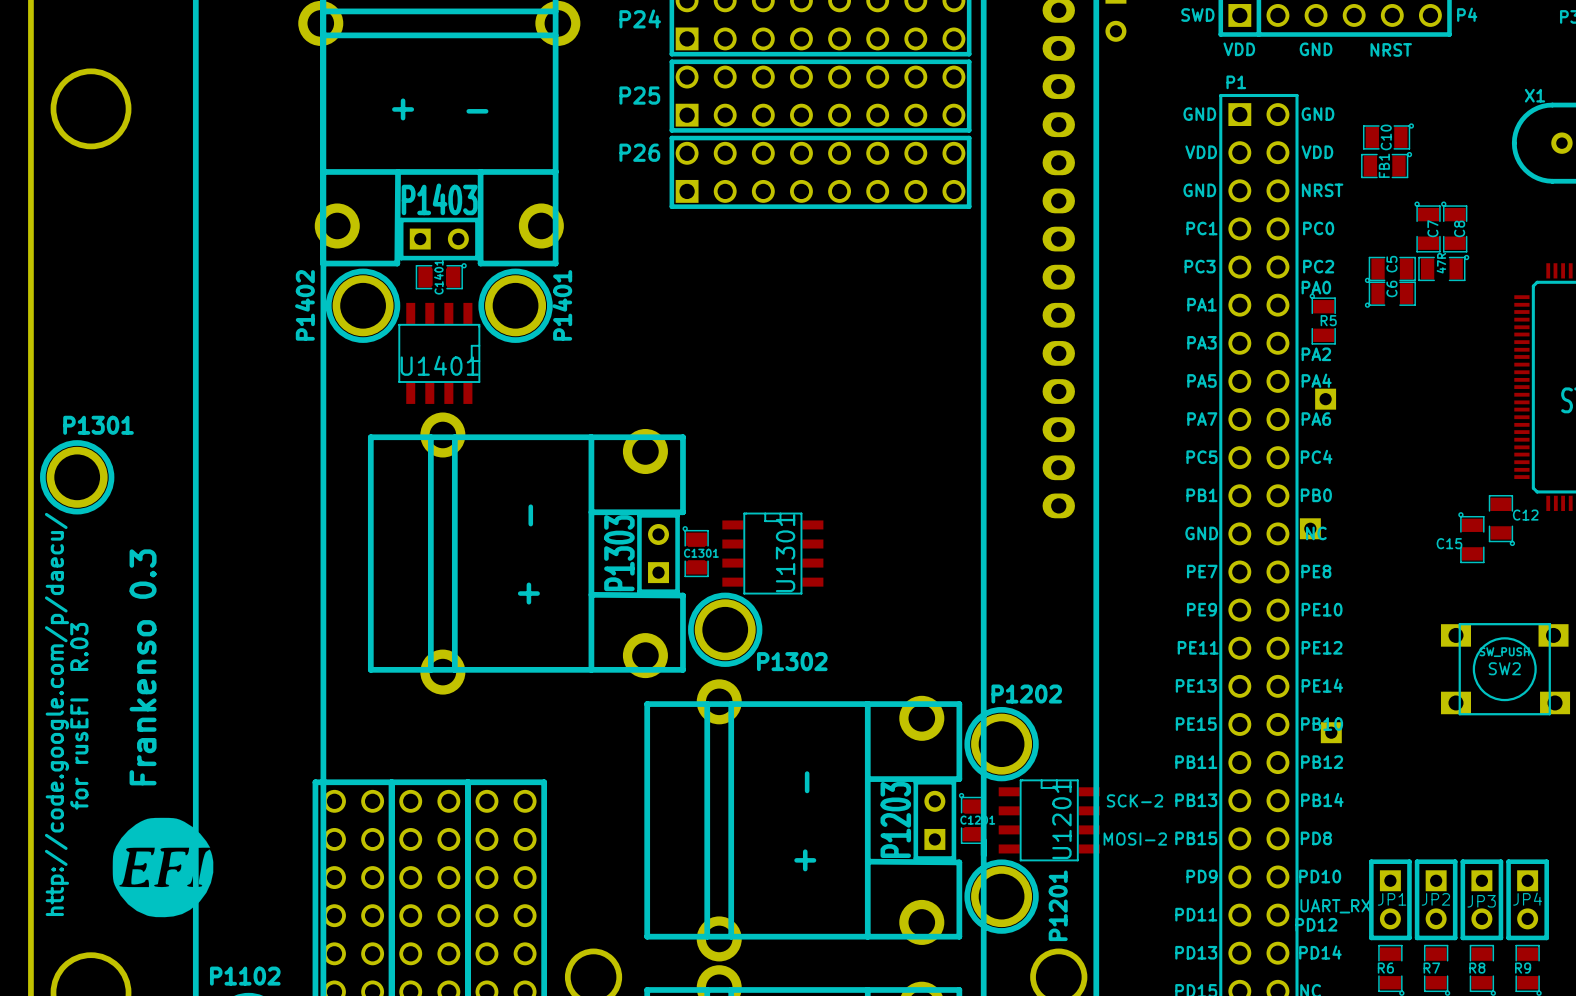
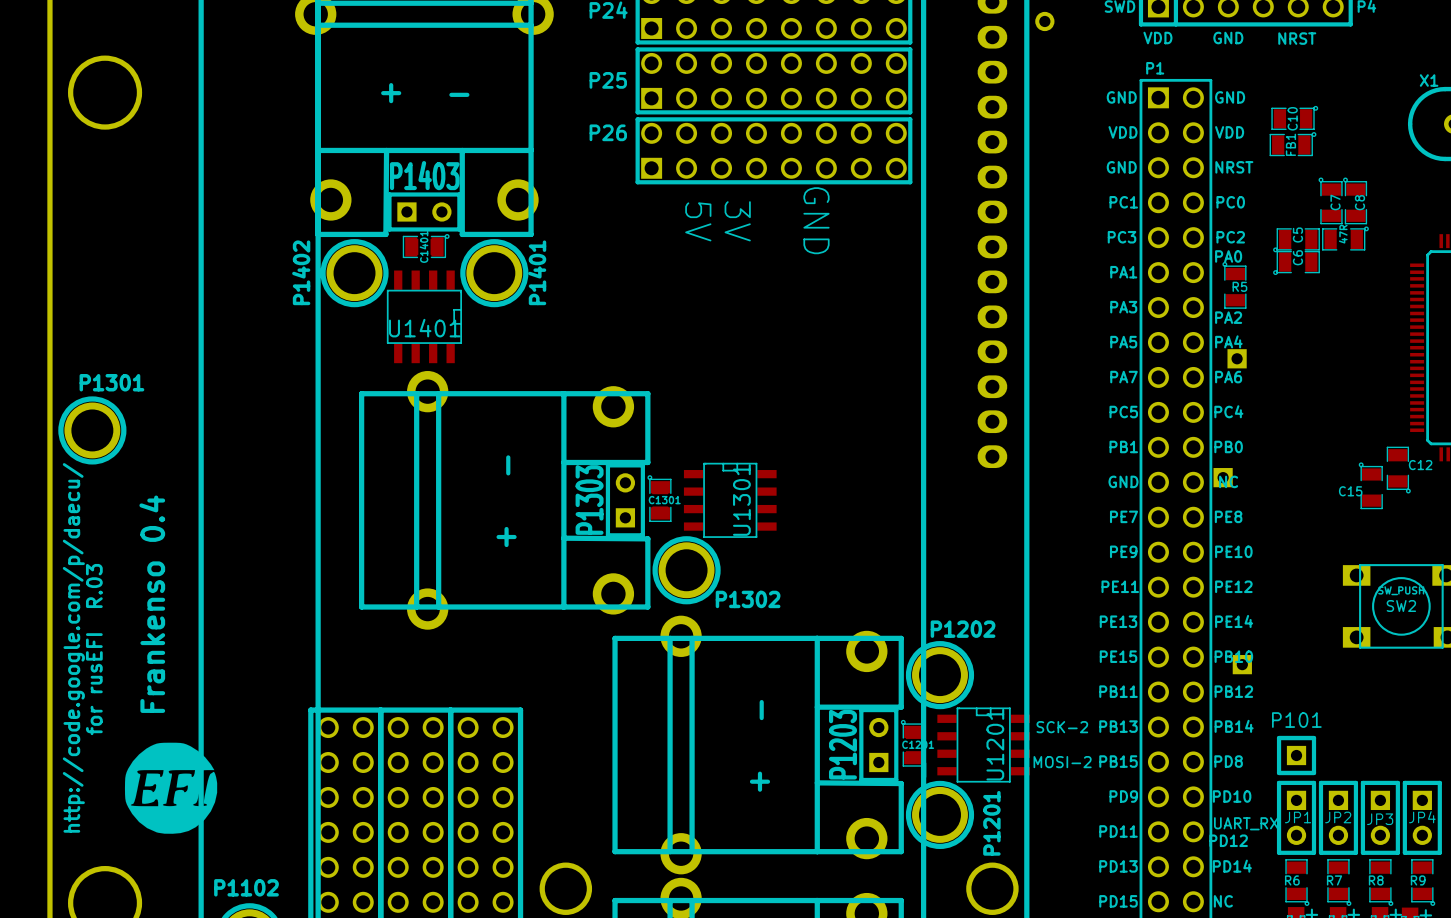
text: none -> GND (816, 220)
text: none -> 5V (698, 221)
text: none -> 3V (737, 221)
text: Frankenso 0.3 (143, 667) -> Frankenso 0.4 (152, 604)
P101: none -> (1296, 755)

